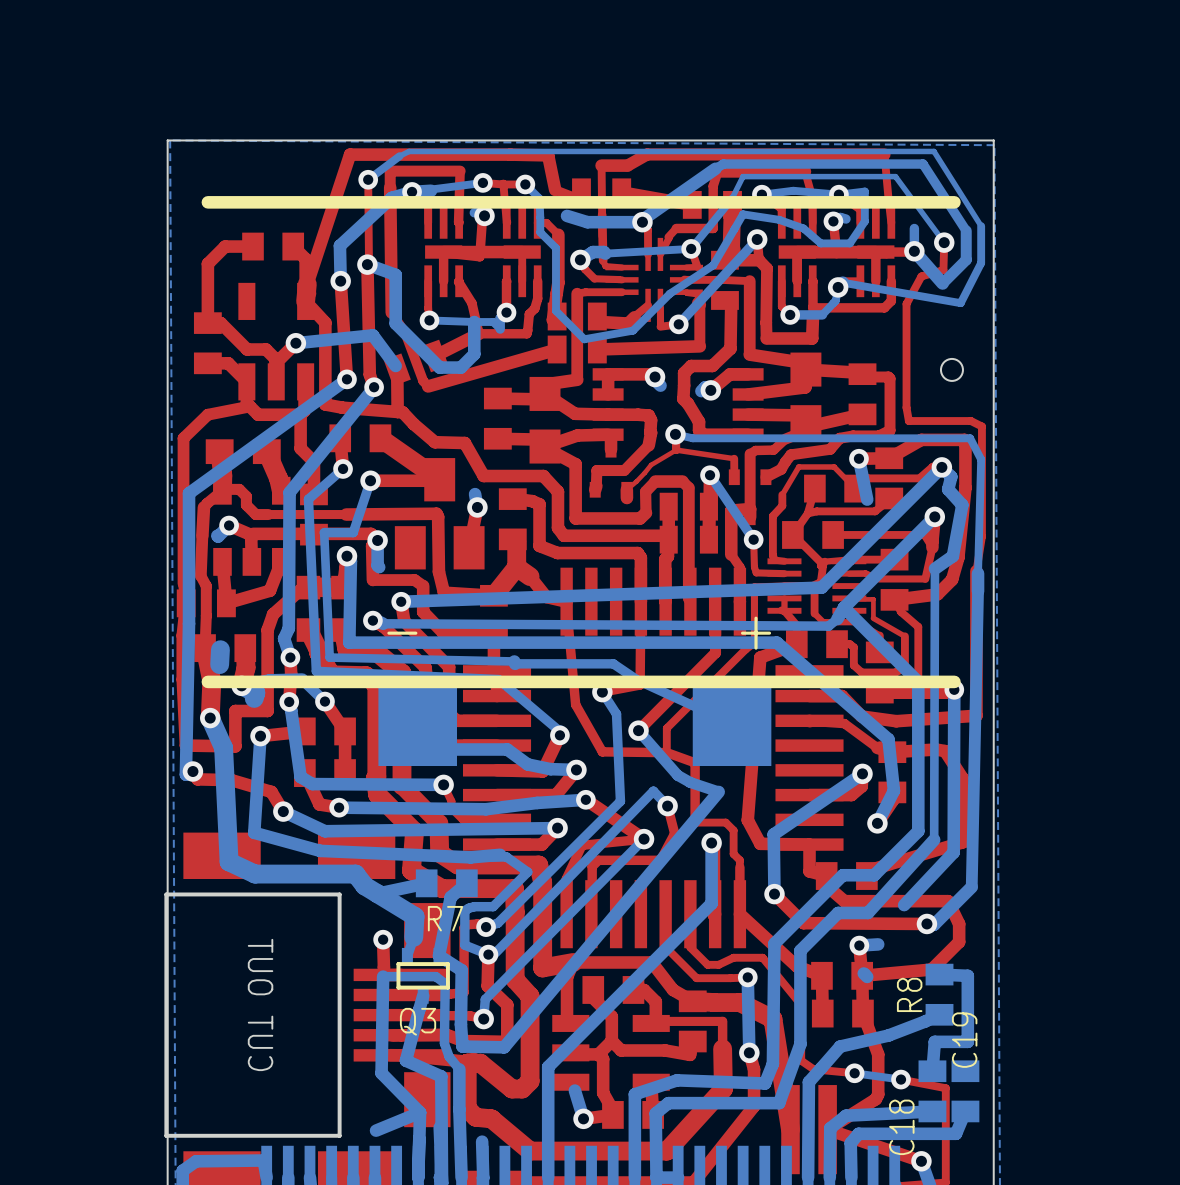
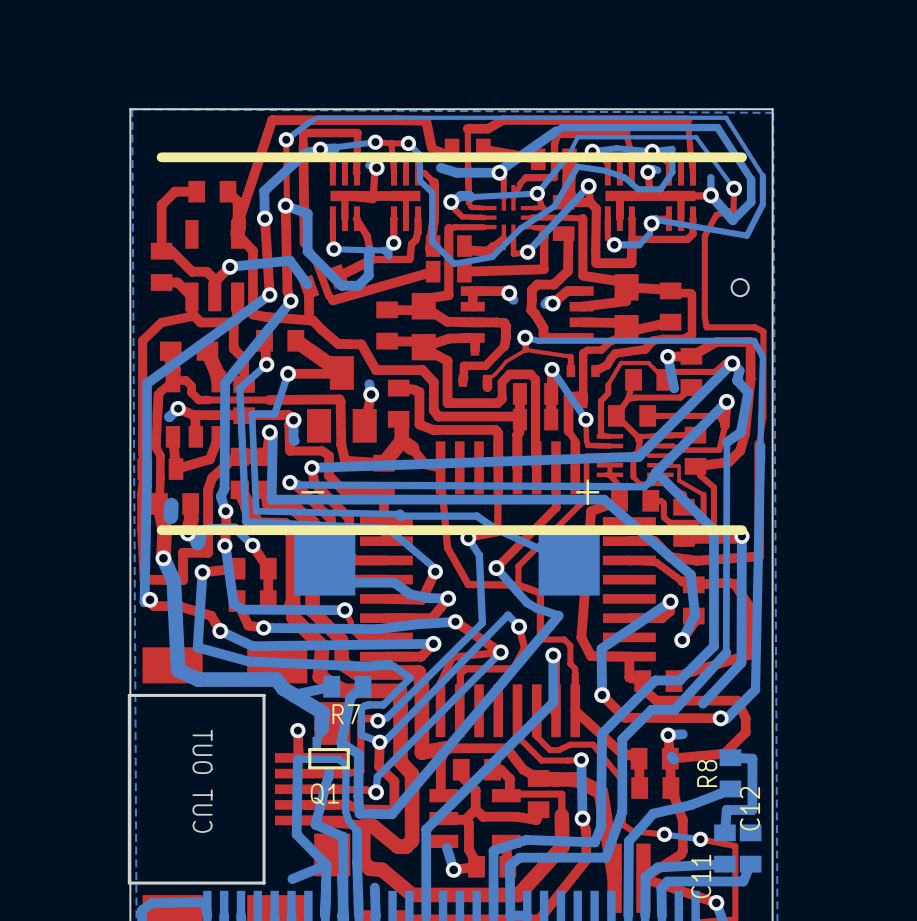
Q3 name: Q3 (418, 1021) -> Q1 (325, 794)
C19 name: C19 (964, 1040) -> C12 (750, 808)
C18 name: C18 (901, 1127) -> C11 (701, 876)

